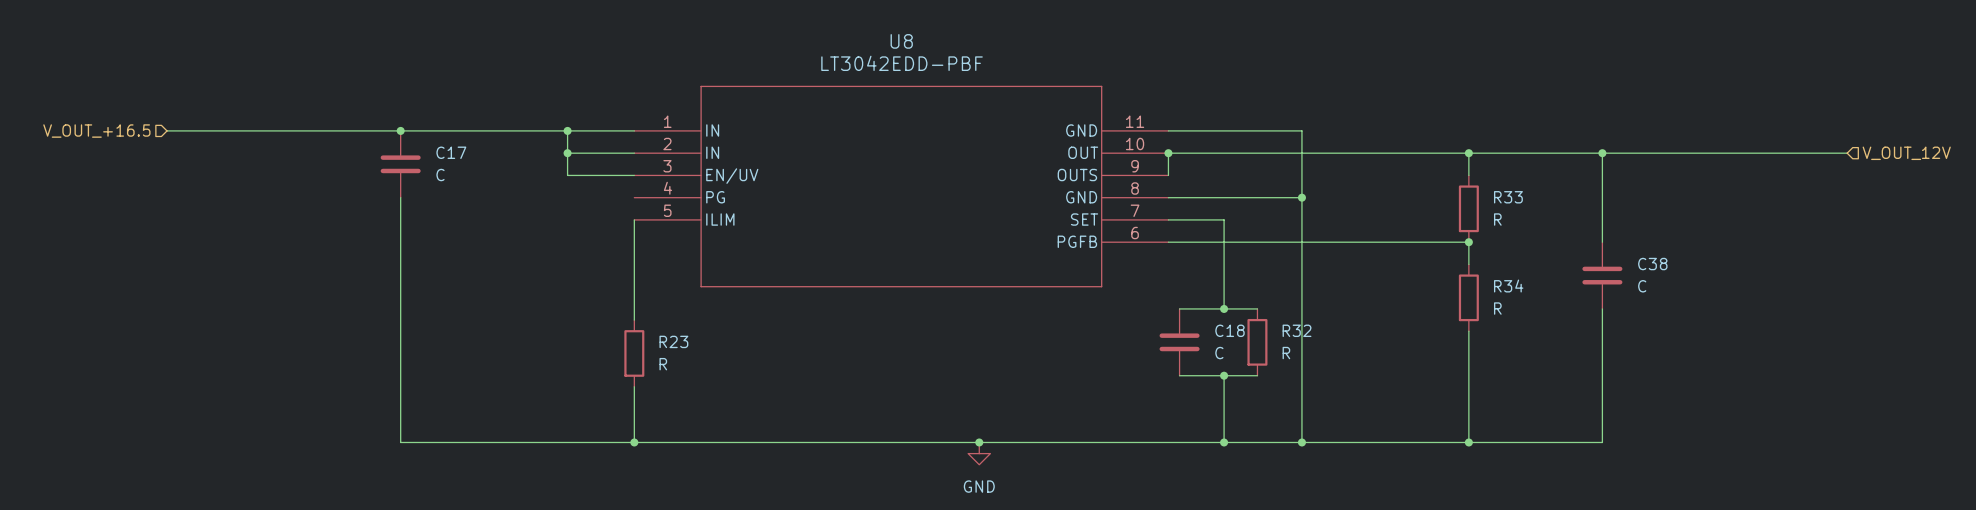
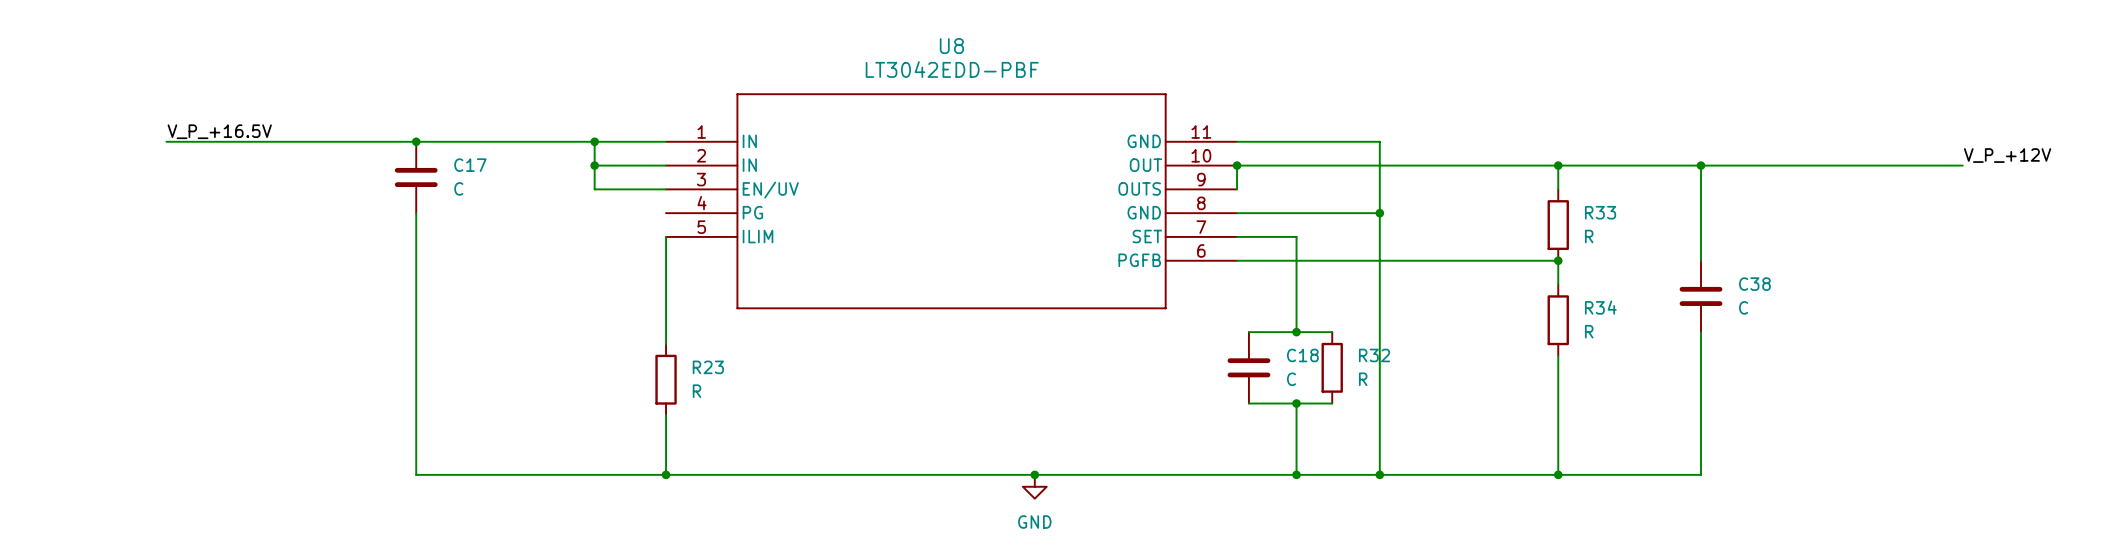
label: none -> V_P_+16.5V (219, 131)
hierarchical label: V_OUT_+16.5 (96, 131) -> none
label: none -> V_P_+12V (2007, 155)
hierarchical label: V_OUT_12V (1906, 153) -> none

